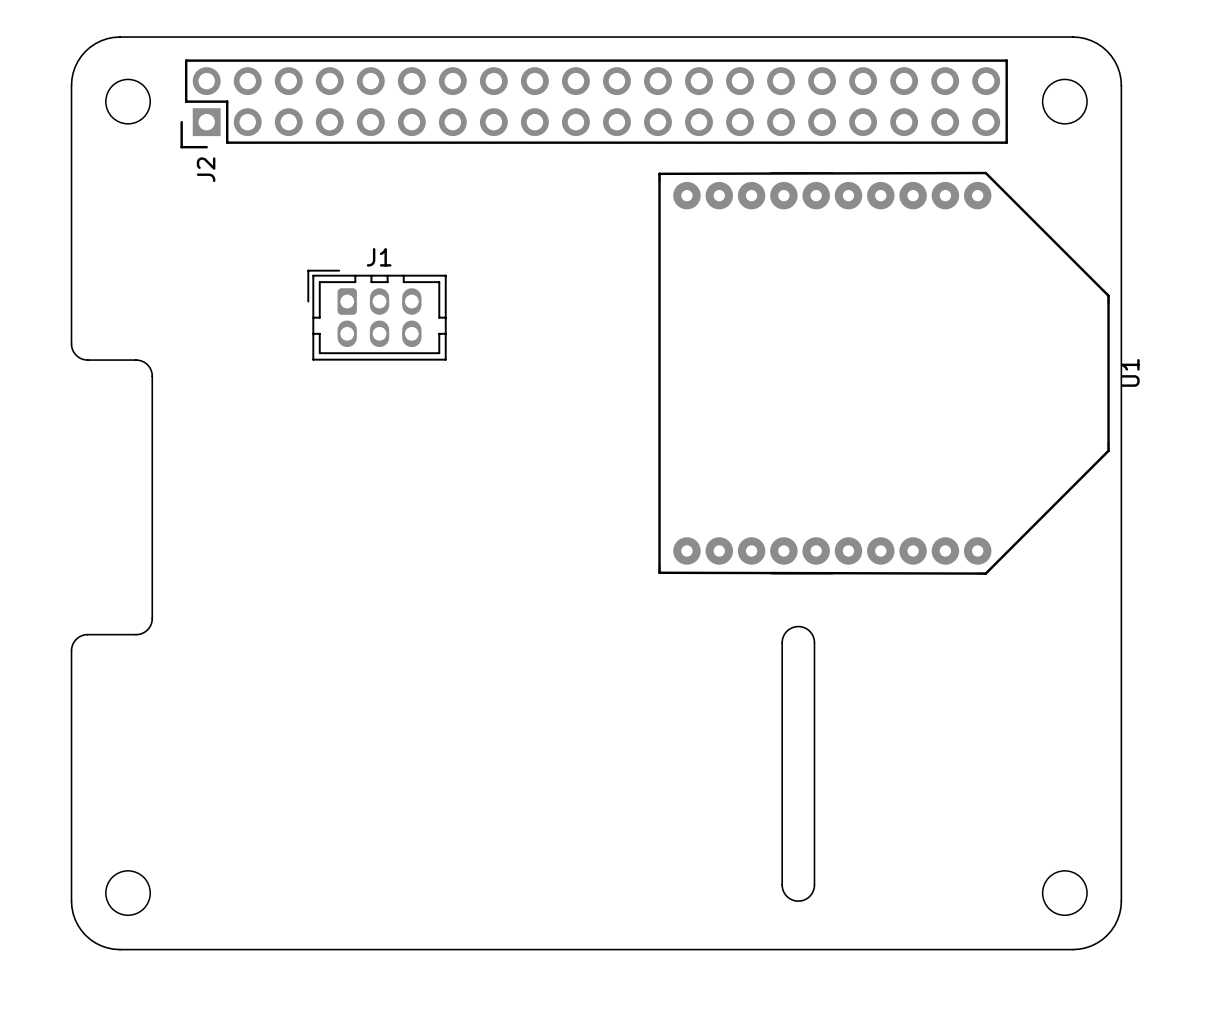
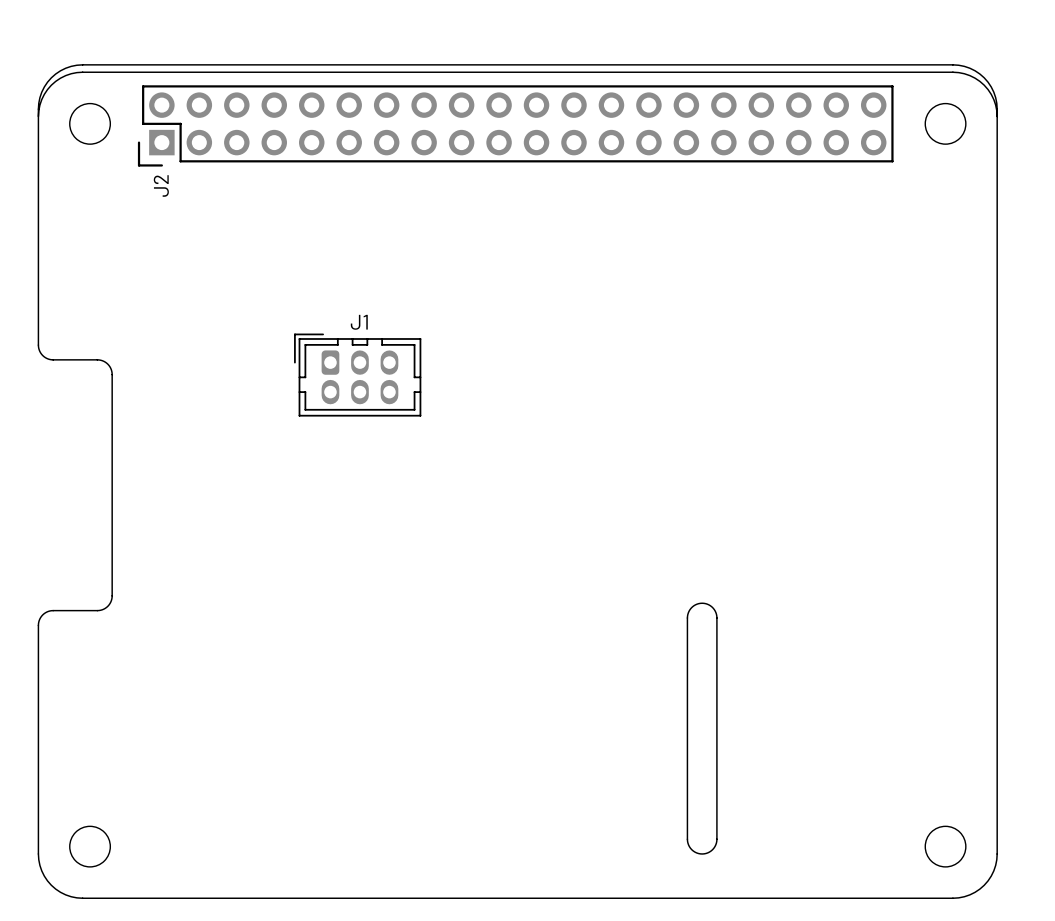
board edge: none -> (38, 116) (41, 99) (51, 85) (65, 75) (82, 72) (952, 72) (969, 75) (984, 85) (993, 99) (997, 116)
line: (985, 173) (659, 173) (659, 572) (985, 573) (1108, 450) (1108, 295) (985, 173) -> none
J1 position: (377, 315) -> (357, 375)
U1: (884, 373) -> none

